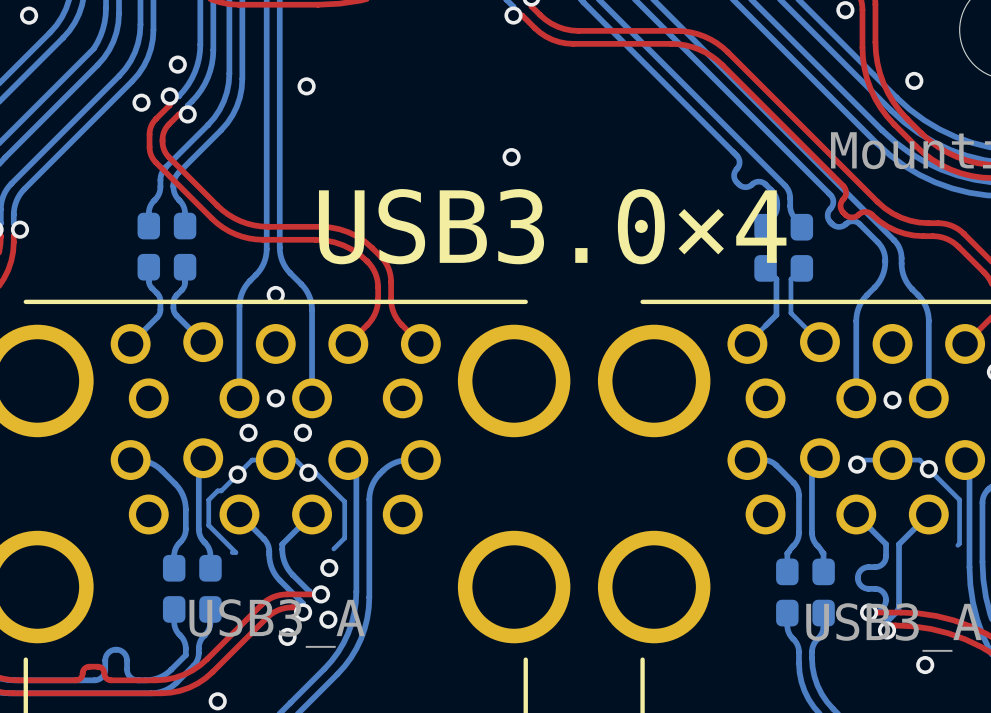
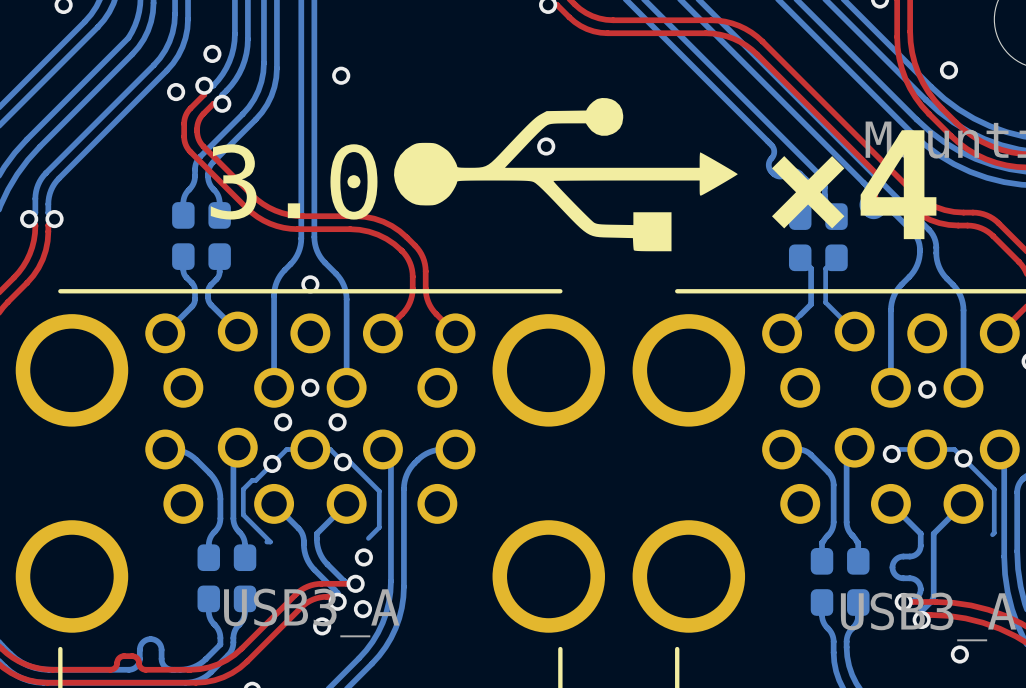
drawing: none -> [394, 97, 738, 252]
text: none -> 3.0 (294, 181)
text: none -> ×4 (854, 184)
text: USB3.0×4 (552, 226) -> none

